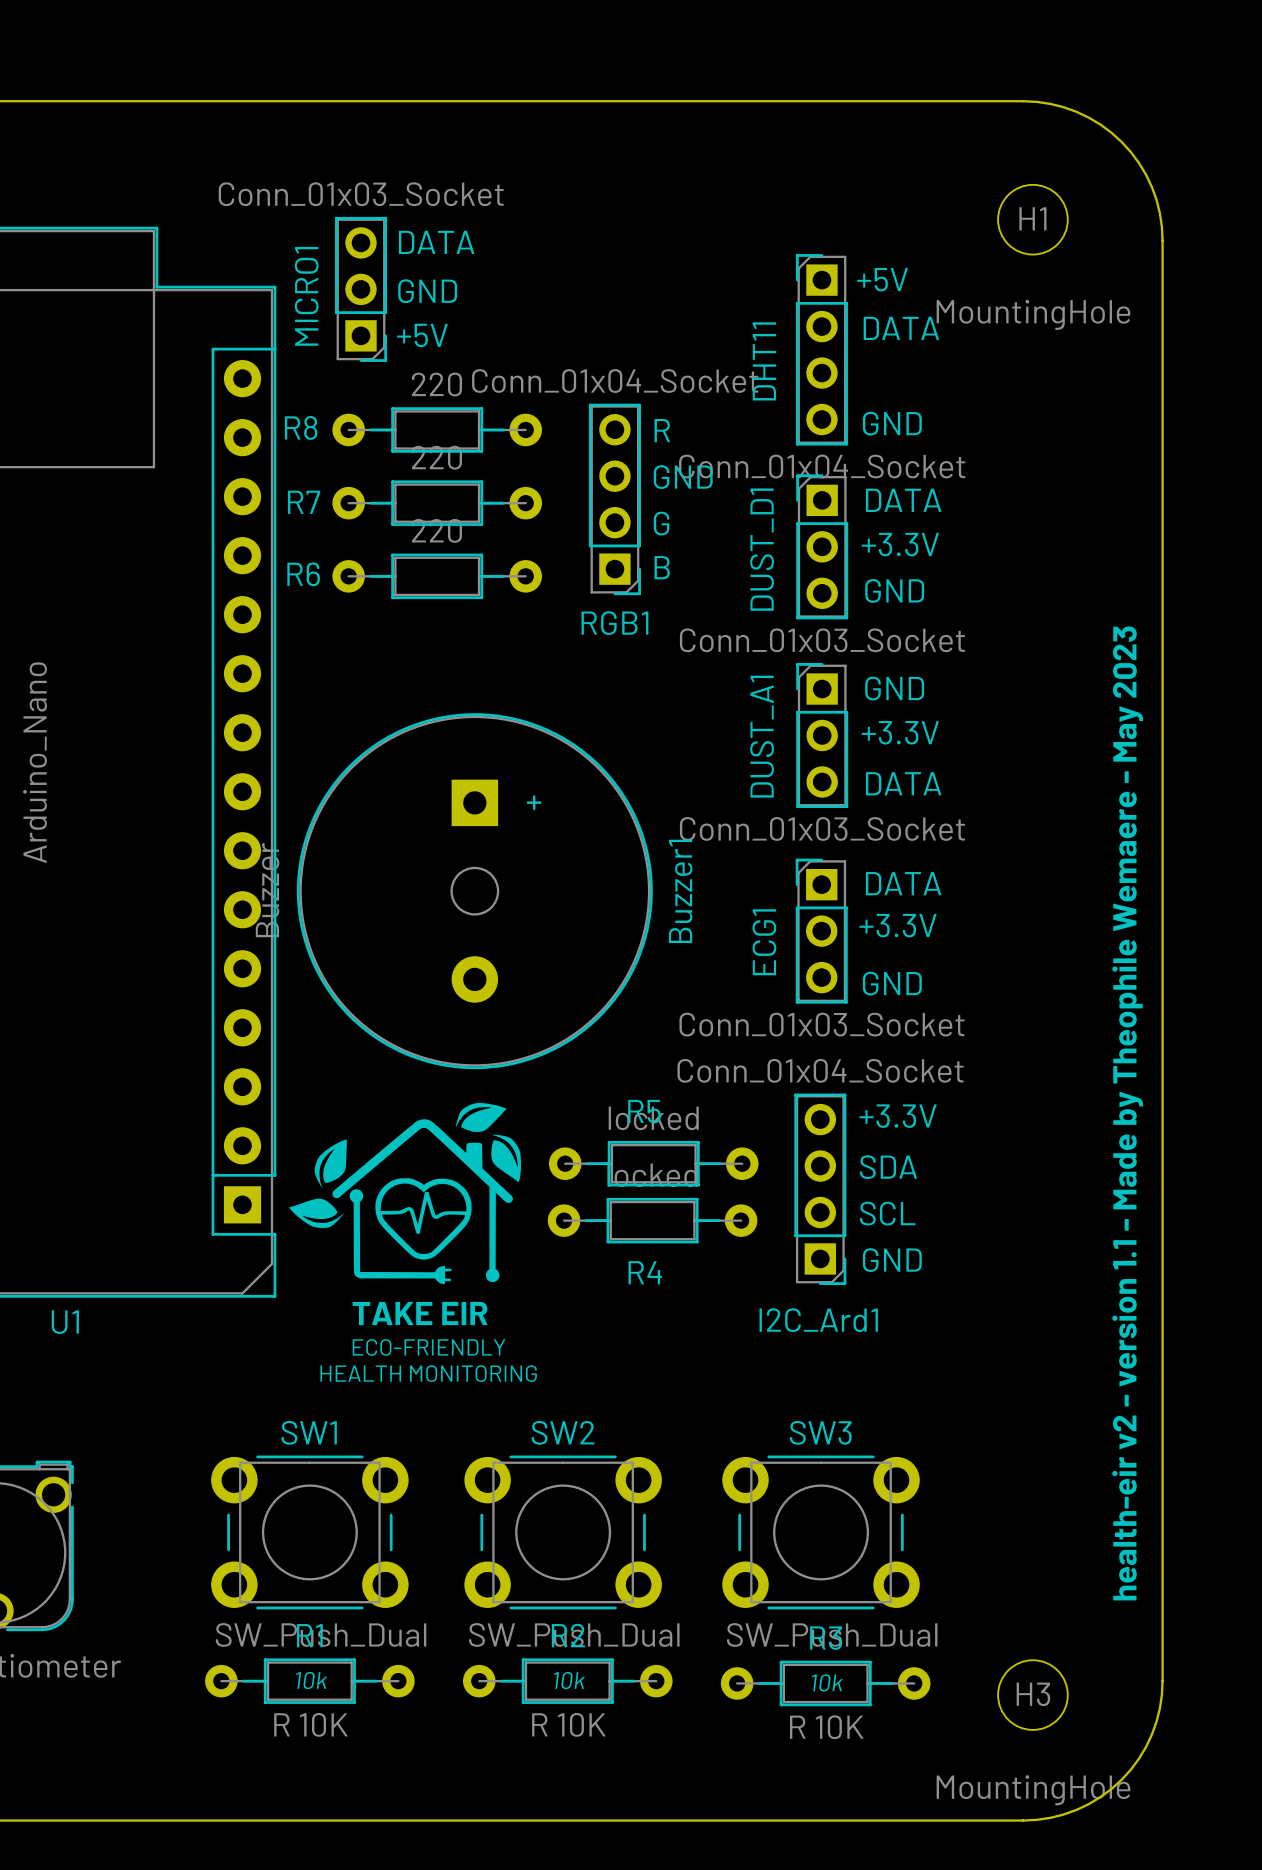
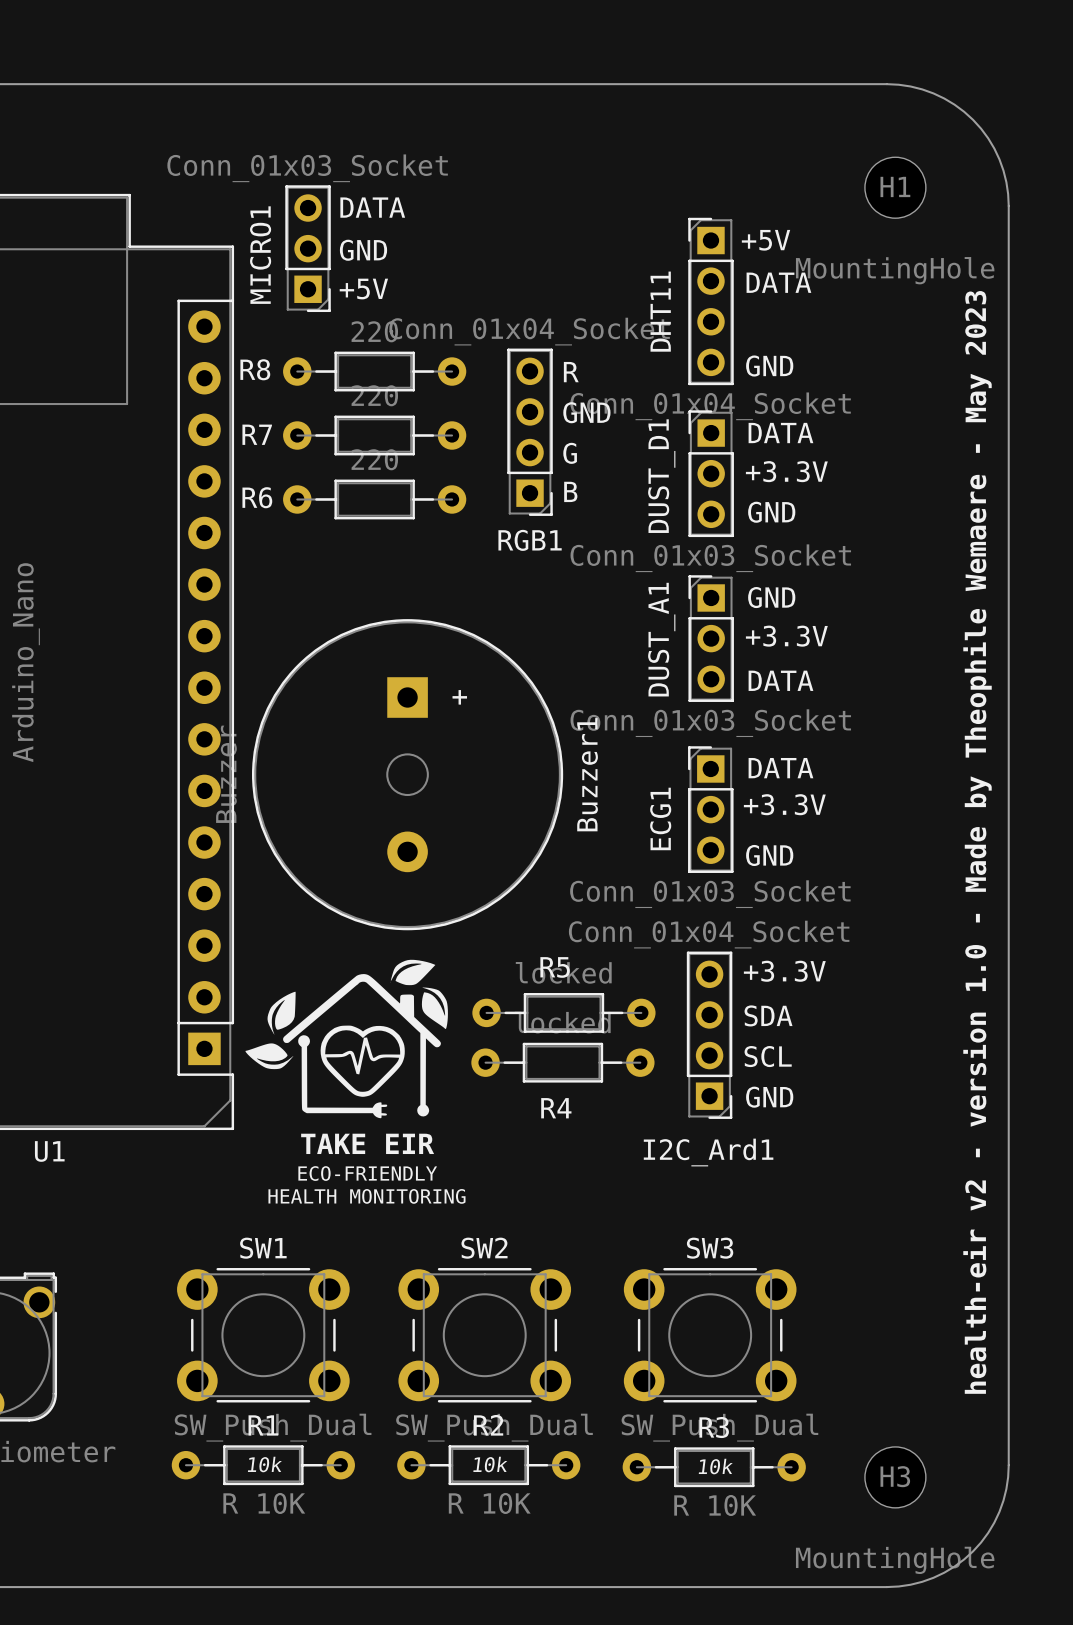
text: health-eir v2 - version 1.1 - Made by Theophile Wemaere - May 2023 (1127, 1113) -> health-eir v2 - version 1.0 - Made by Theophile Wemaere - May 2023 (977, 842)

